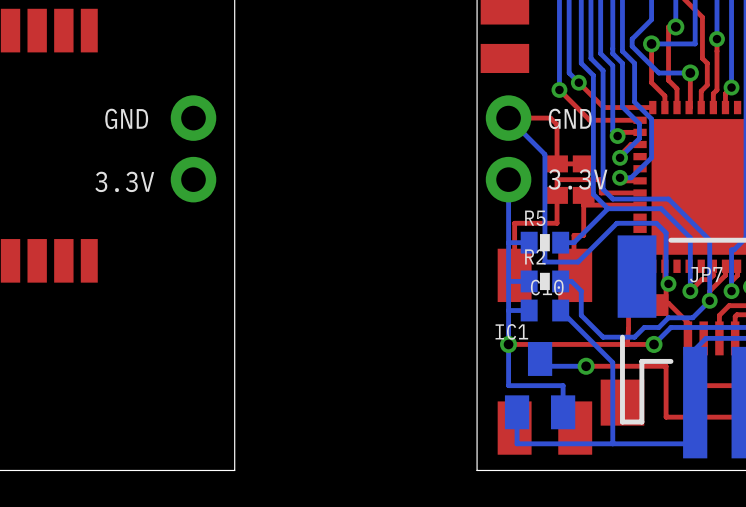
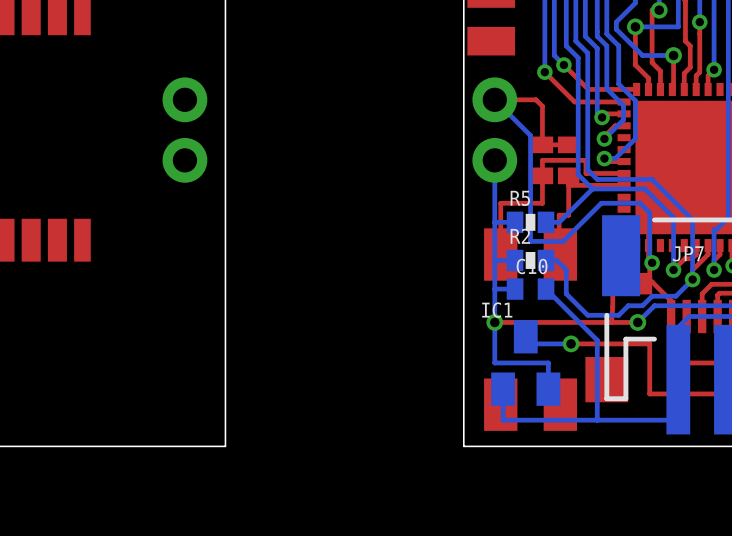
text: GND (126, 118) -> none
text: GND (570, 118) -> none
text: 3.3V (577, 179) -> none
text: 3.3V (124, 181) -> none

